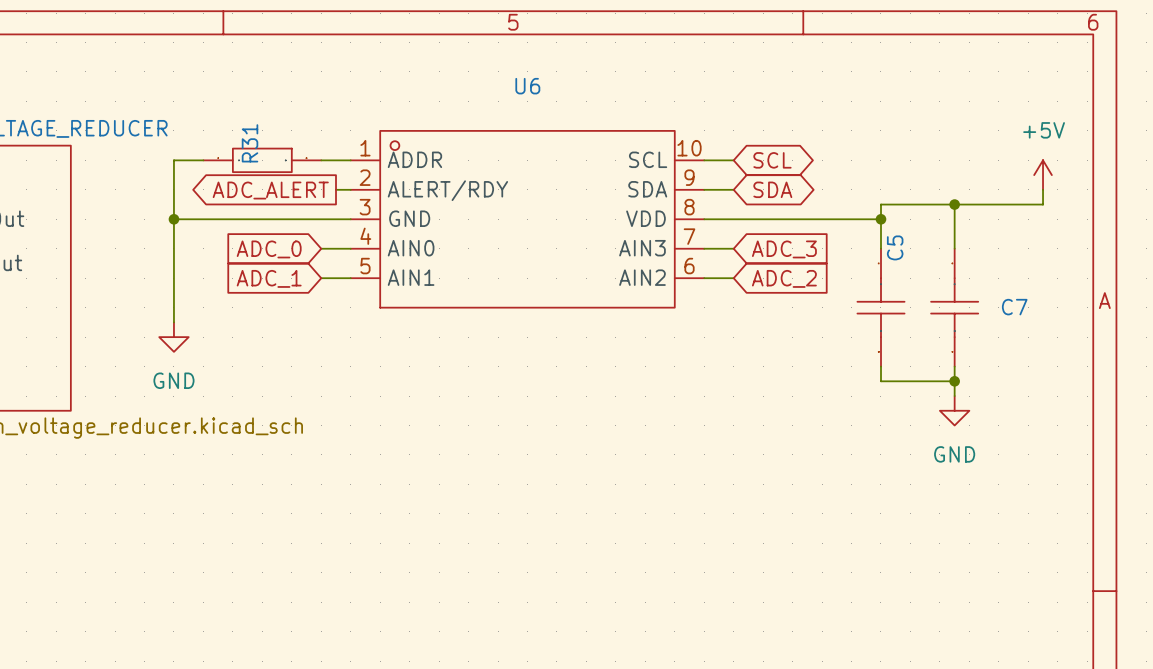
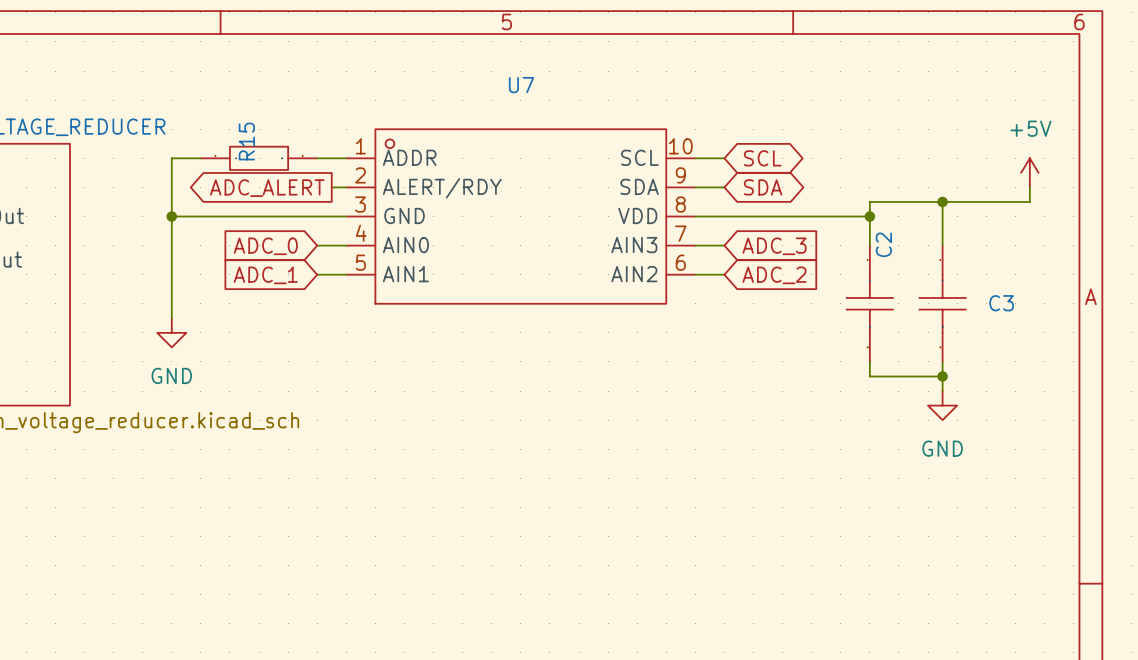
U6 name: U6 (527, 86) -> U7 (521, 85)
R31 name: R31 (250, 143) -> R15 (246, 141)
C5 name: C5 (895, 247) -> C2 (883, 244)
C7 name: C7 (1014, 307) -> C3 (1001, 303)

